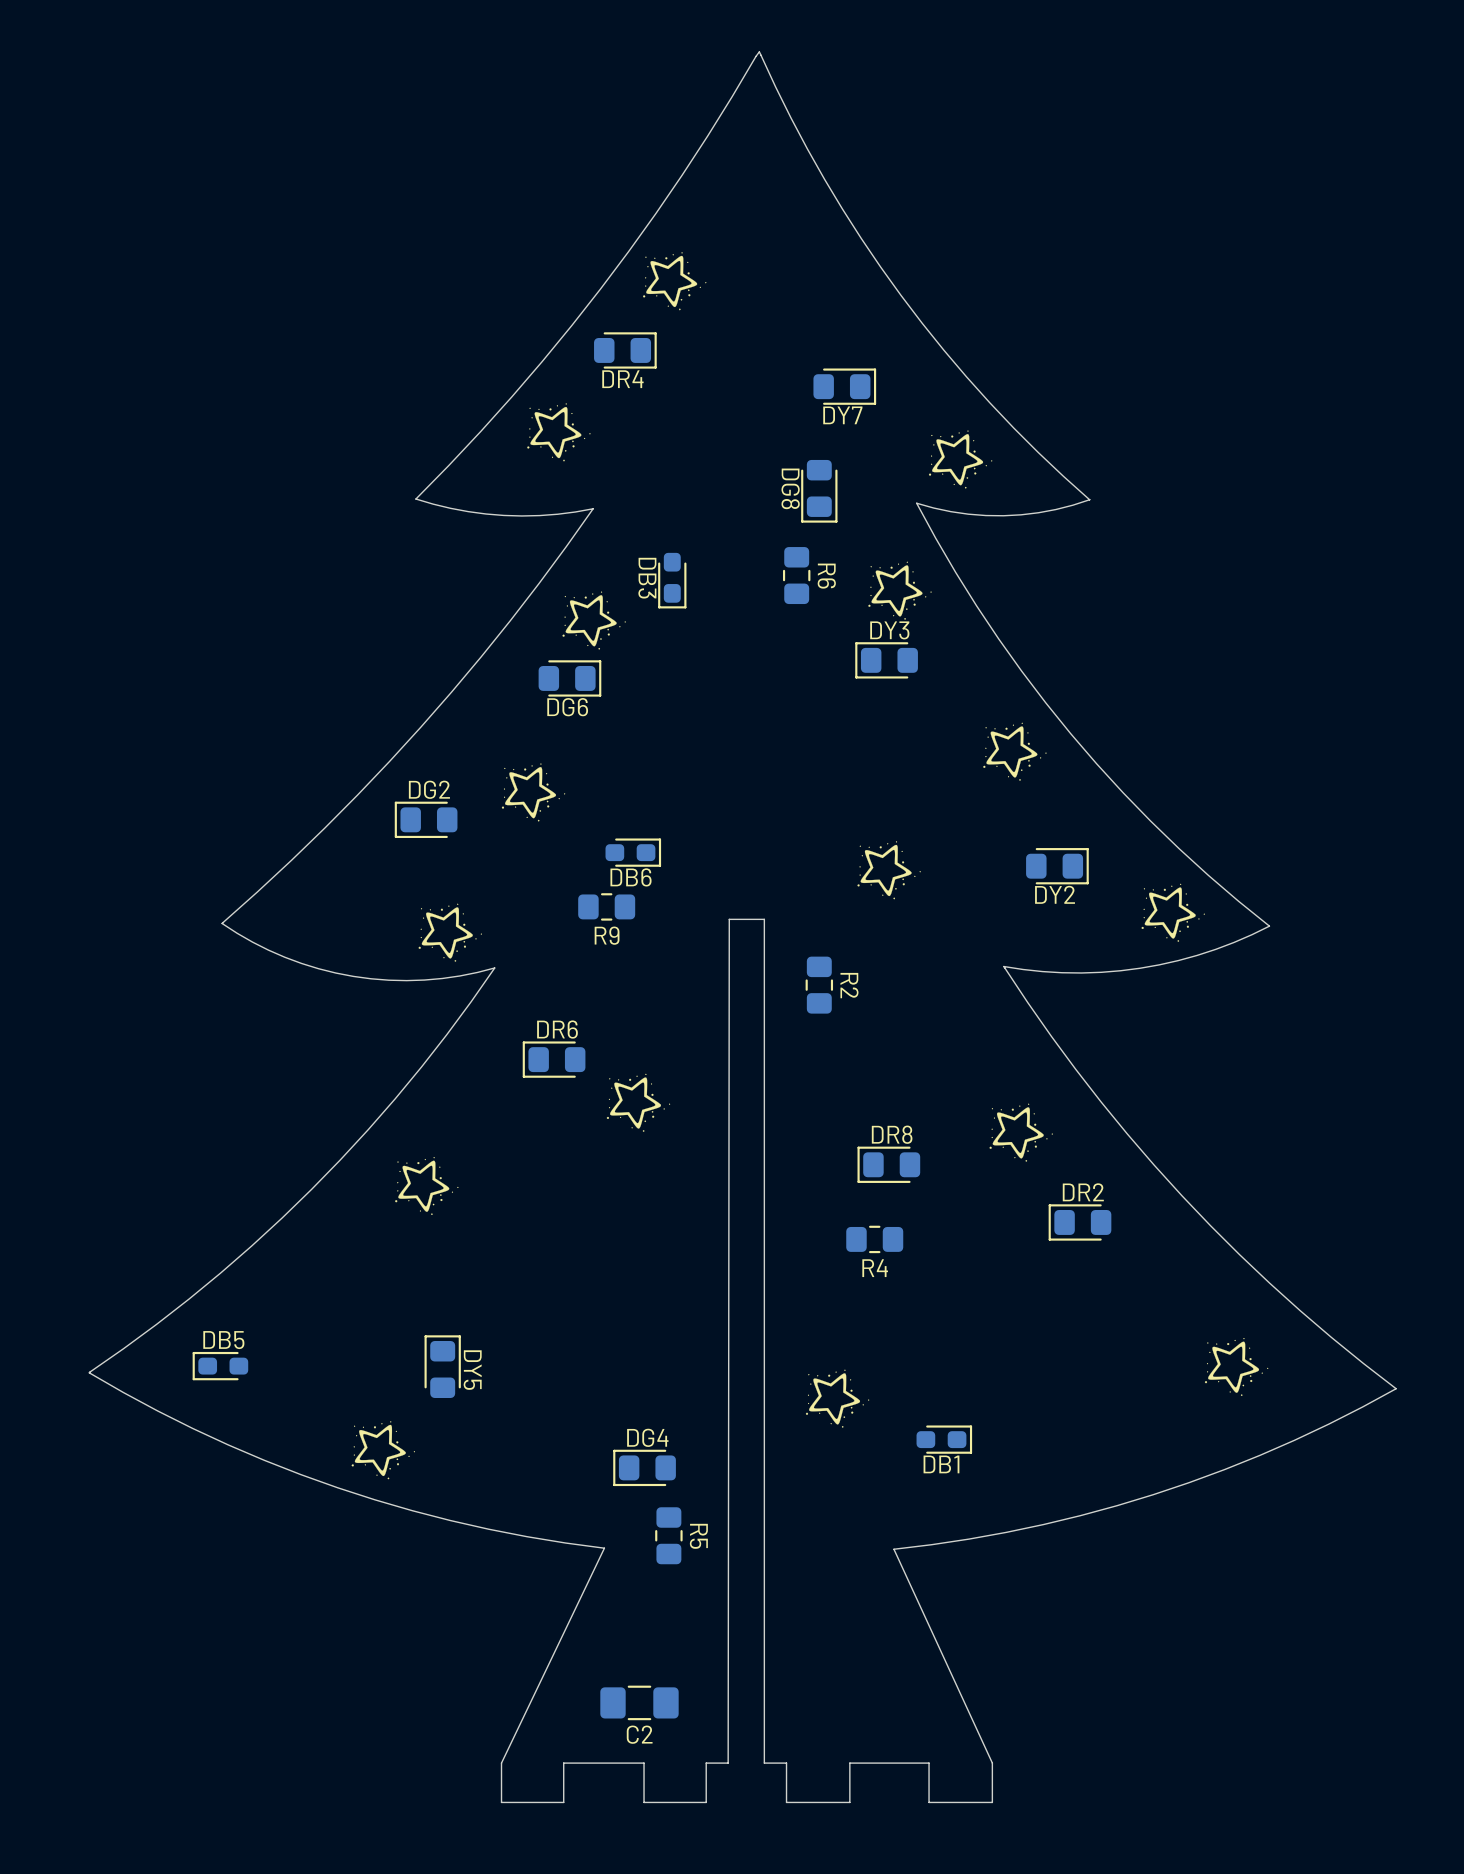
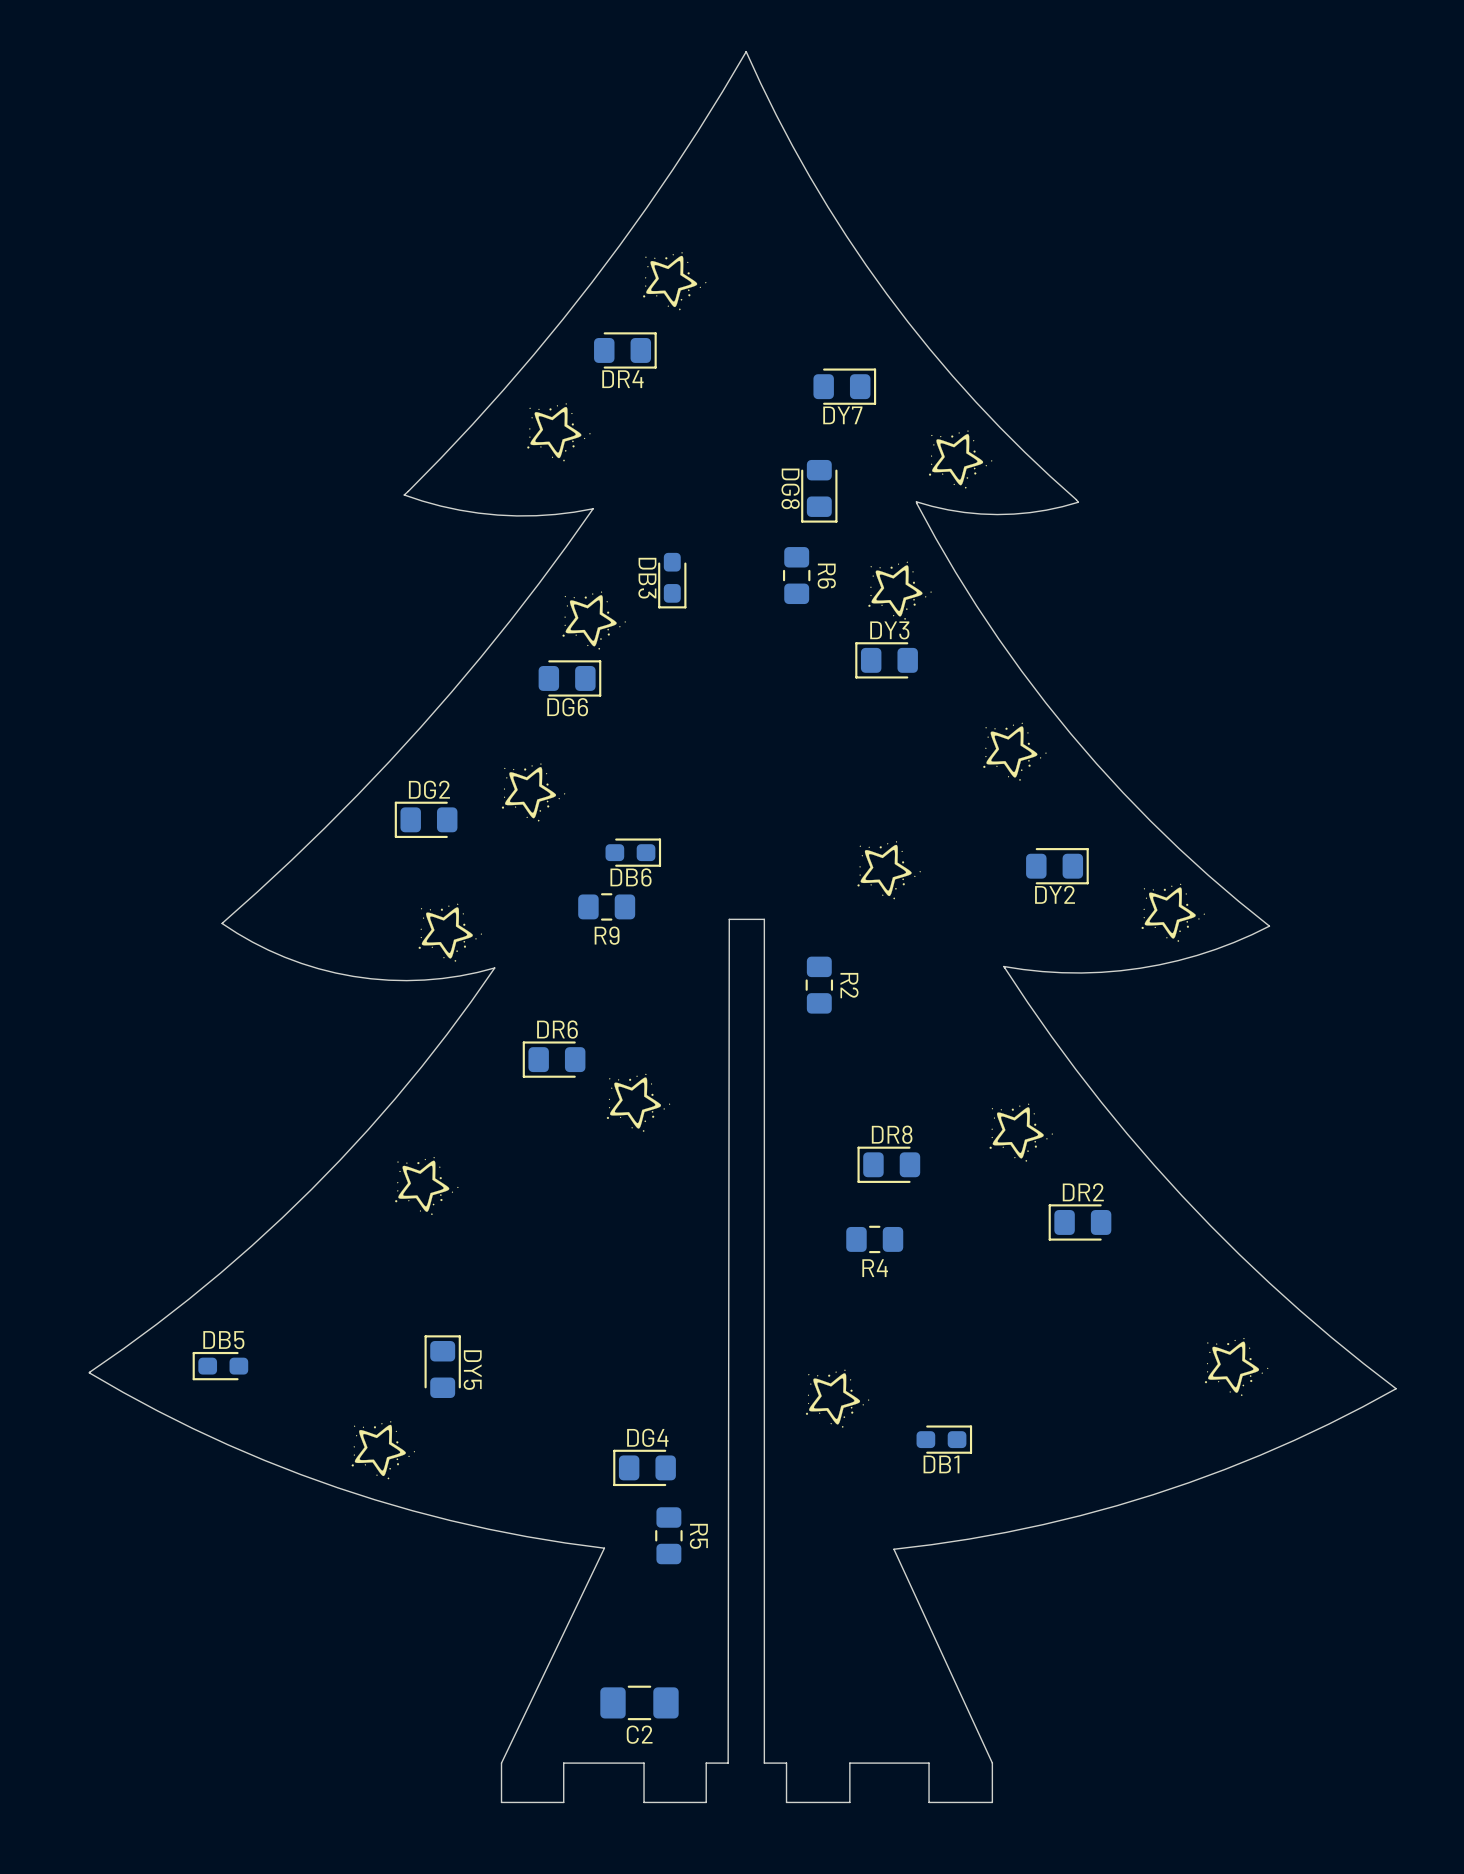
board edge: none -> (746, 51) (672, 169) (591, 282) (503, 390) (404, 495) (459, 510) (497, 515) (555, 514) (593, 508)
board edge: (916, 503) (968, 514) (1003, 515) (1038, 512) (1089, 499) (1038, 452) (989, 402) (943, 350) (901, 295) (861, 238) (824, 179) (791, 118) (759, 51) (682, 175) (600, 288) (511, 397) (415, 499) (450, 508) (503, 515) (557, 514) (593, 508) -> (916, 503) (916, 501) (964, 512) (997, 514) (1046, 510) (1078, 502) (1024, 452) (975, 402) (929, 349) (886, 293) (846, 236) (809, 176) (776, 115) (746, 51)

